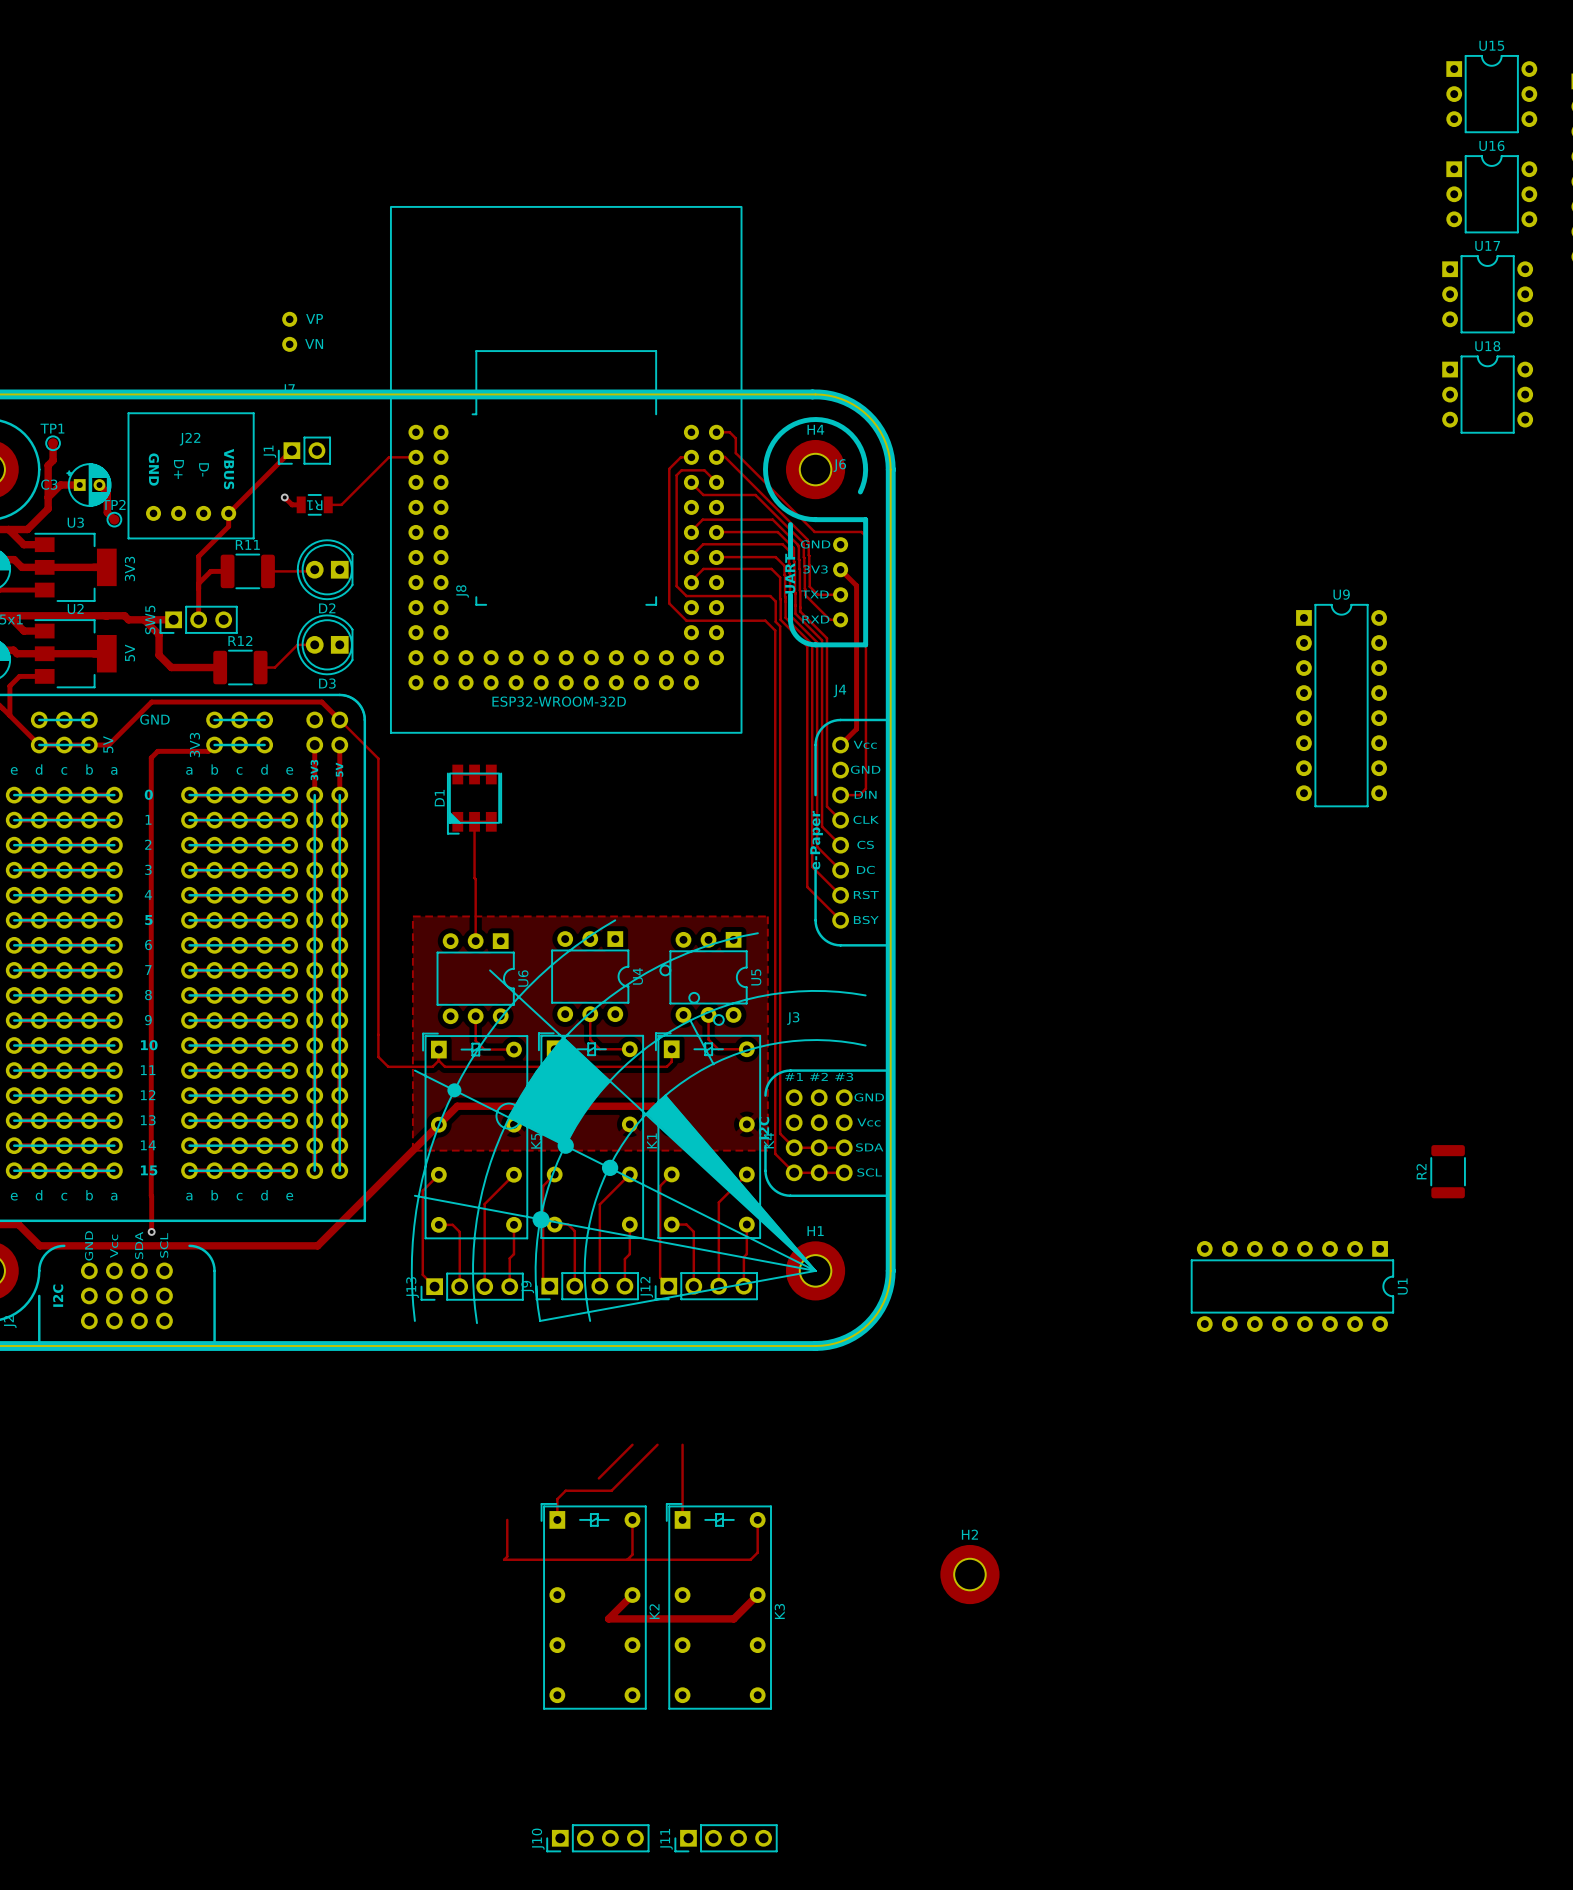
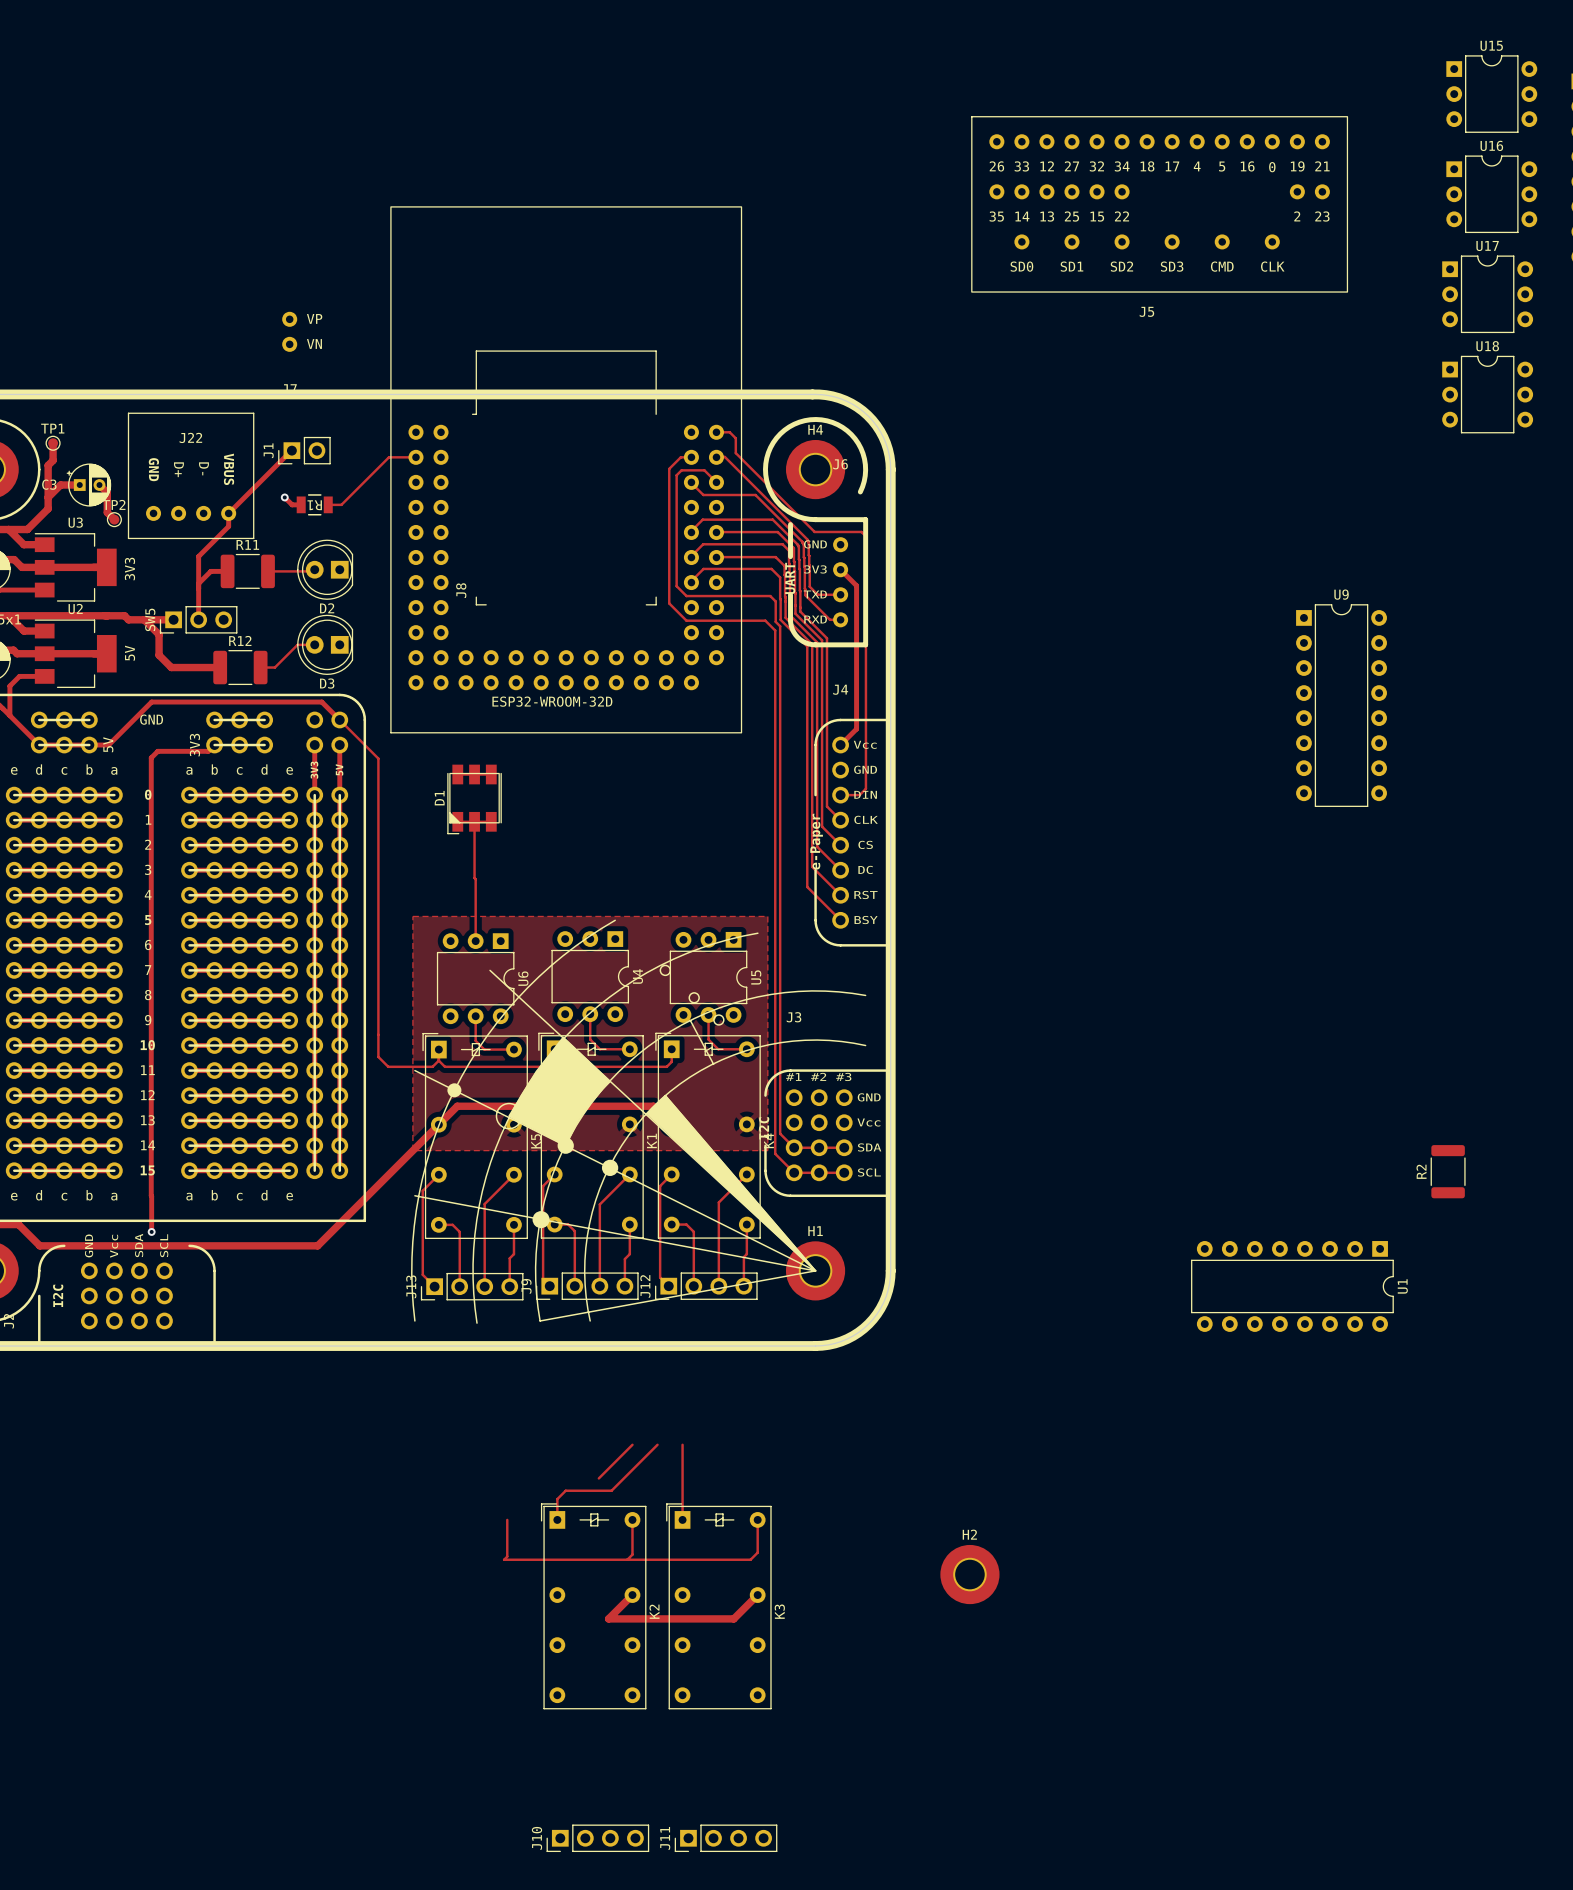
J5: none -> (1159, 204)

